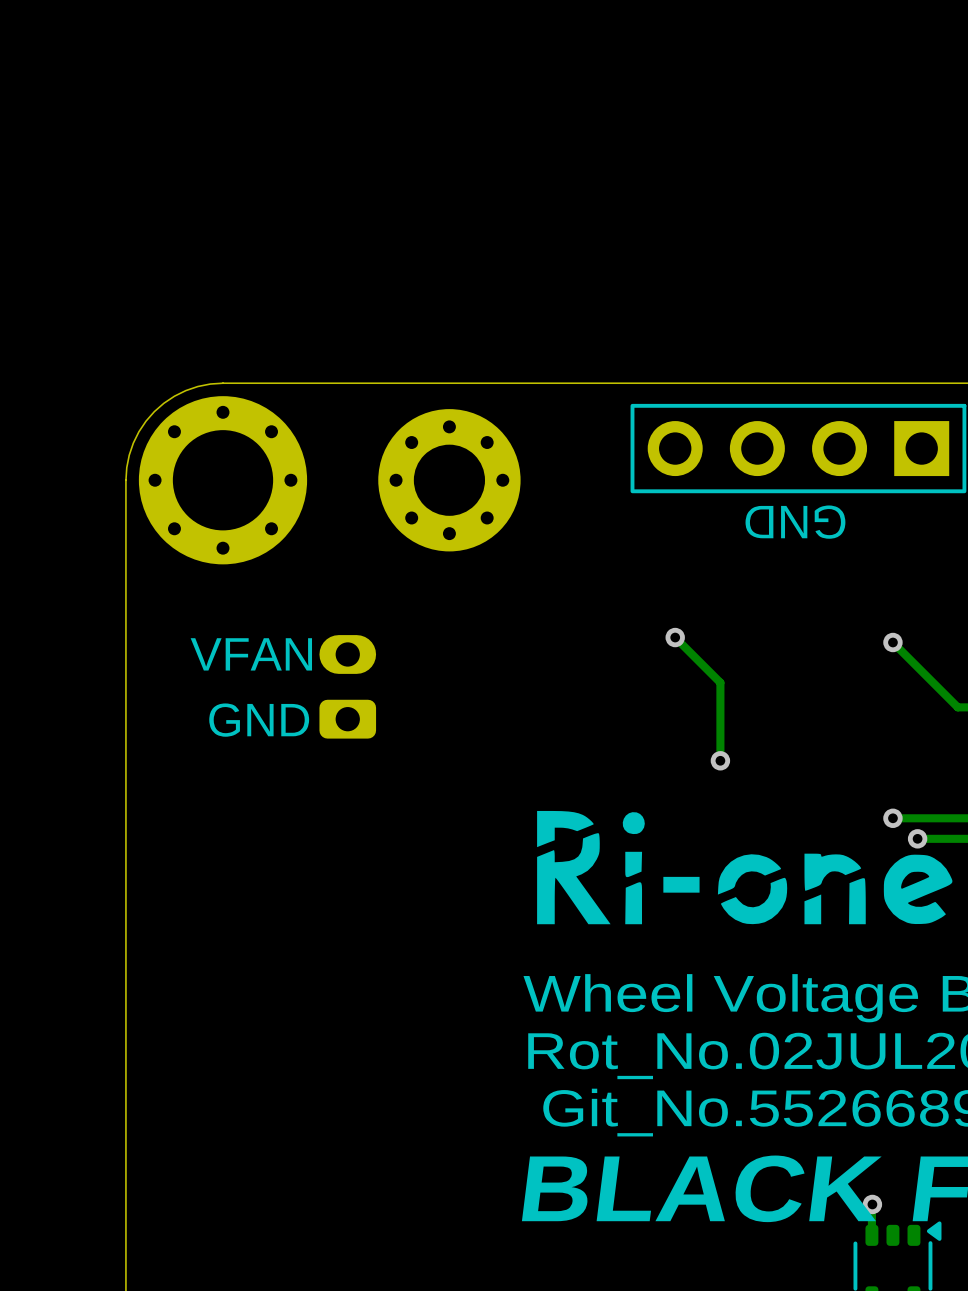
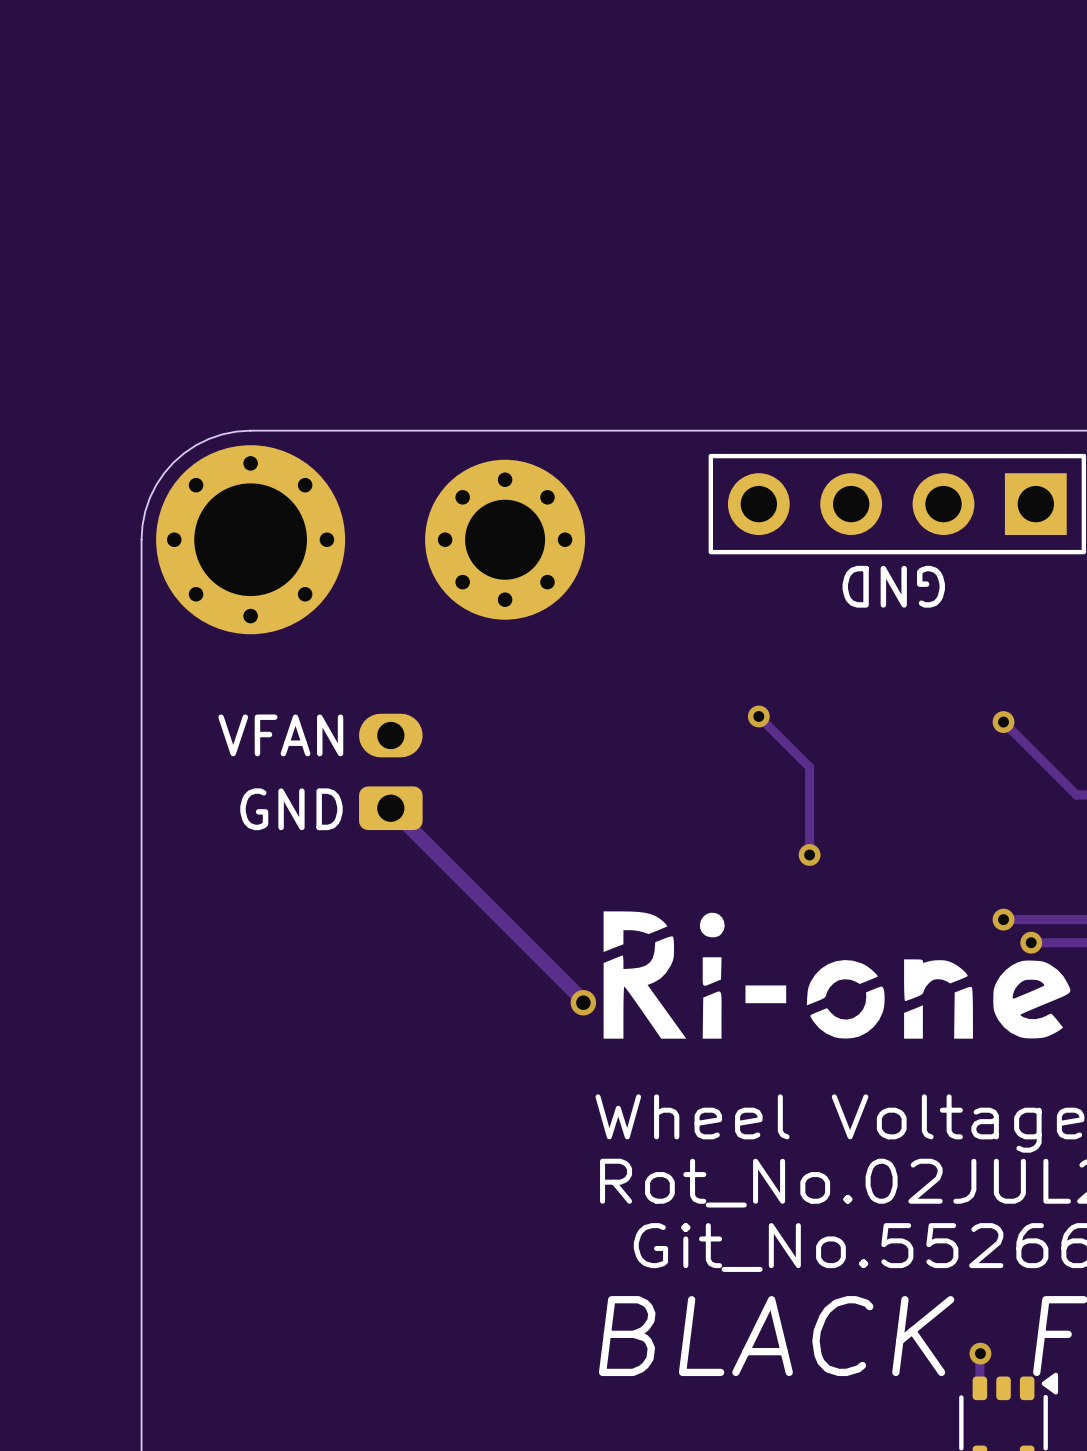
track: none -> (390, 808) (583, 1002)
via: none -> (583, 1002)

